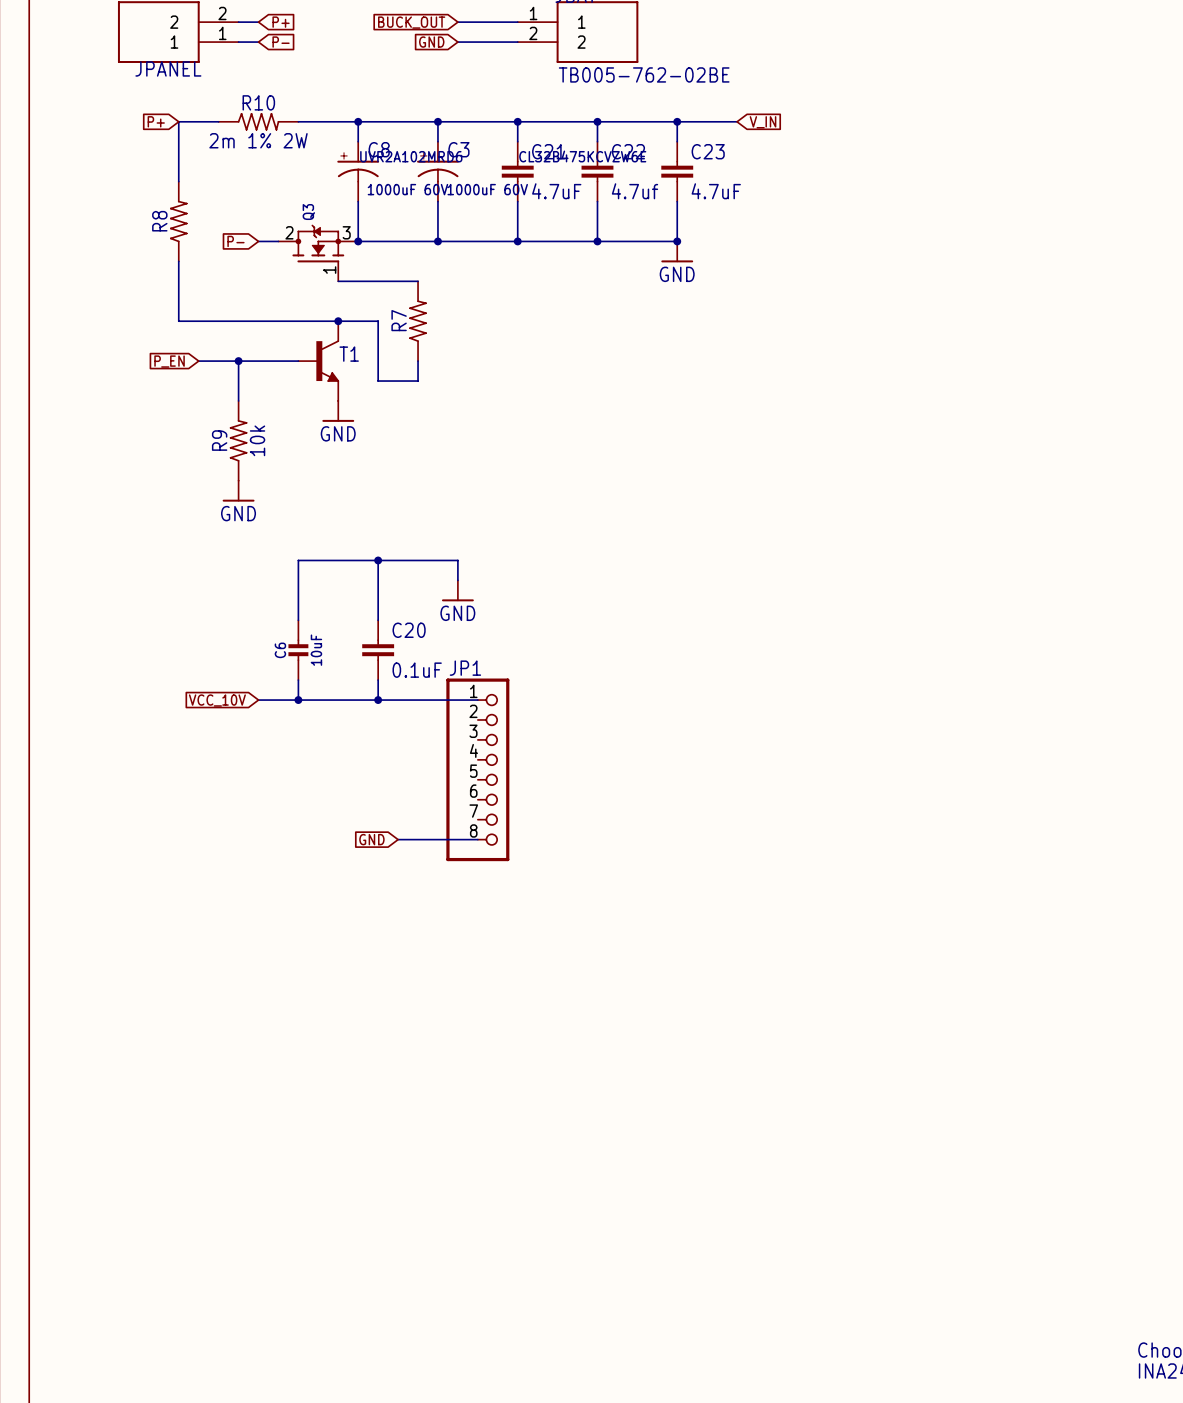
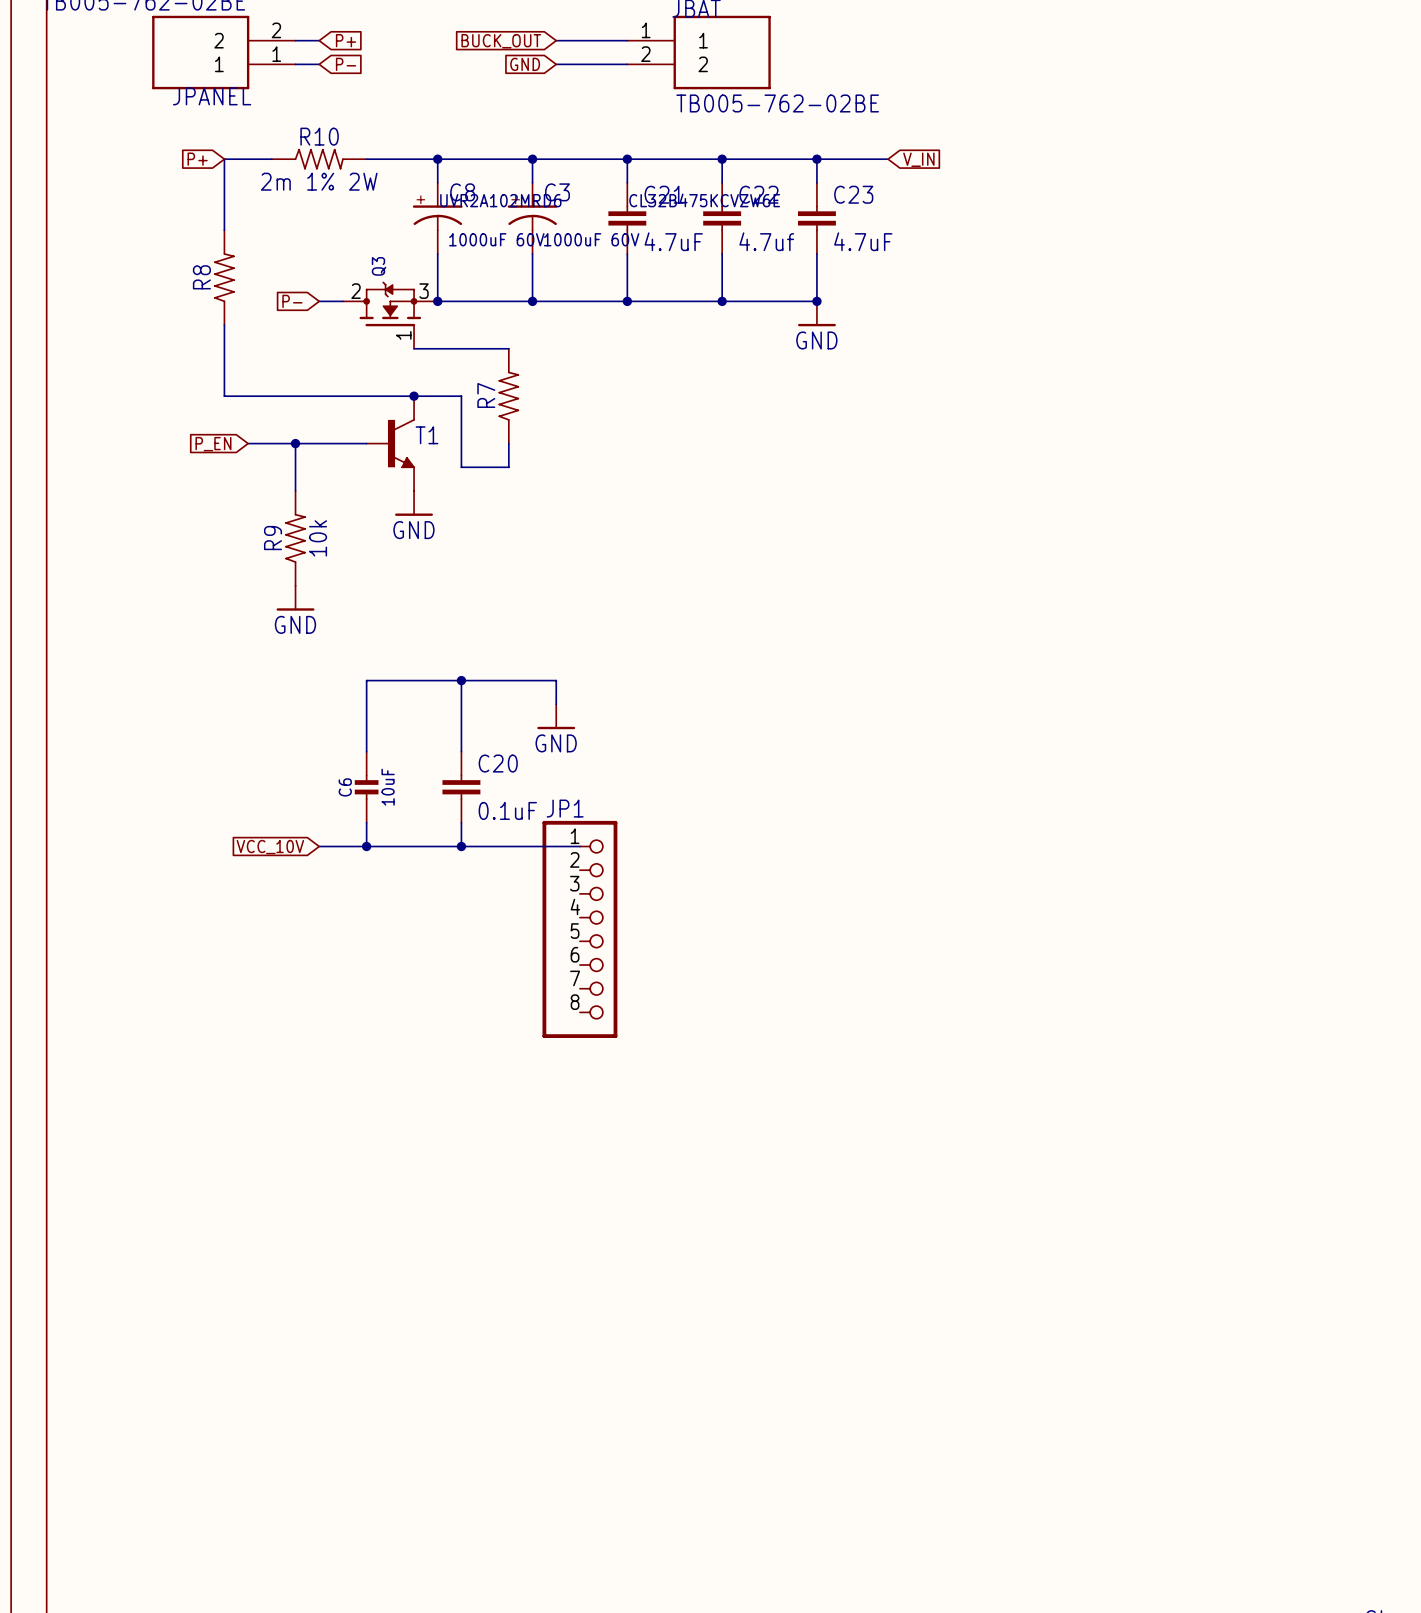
global label: GND (371, 839) -> none
wire: (398, 839) (477, 839) -> none

